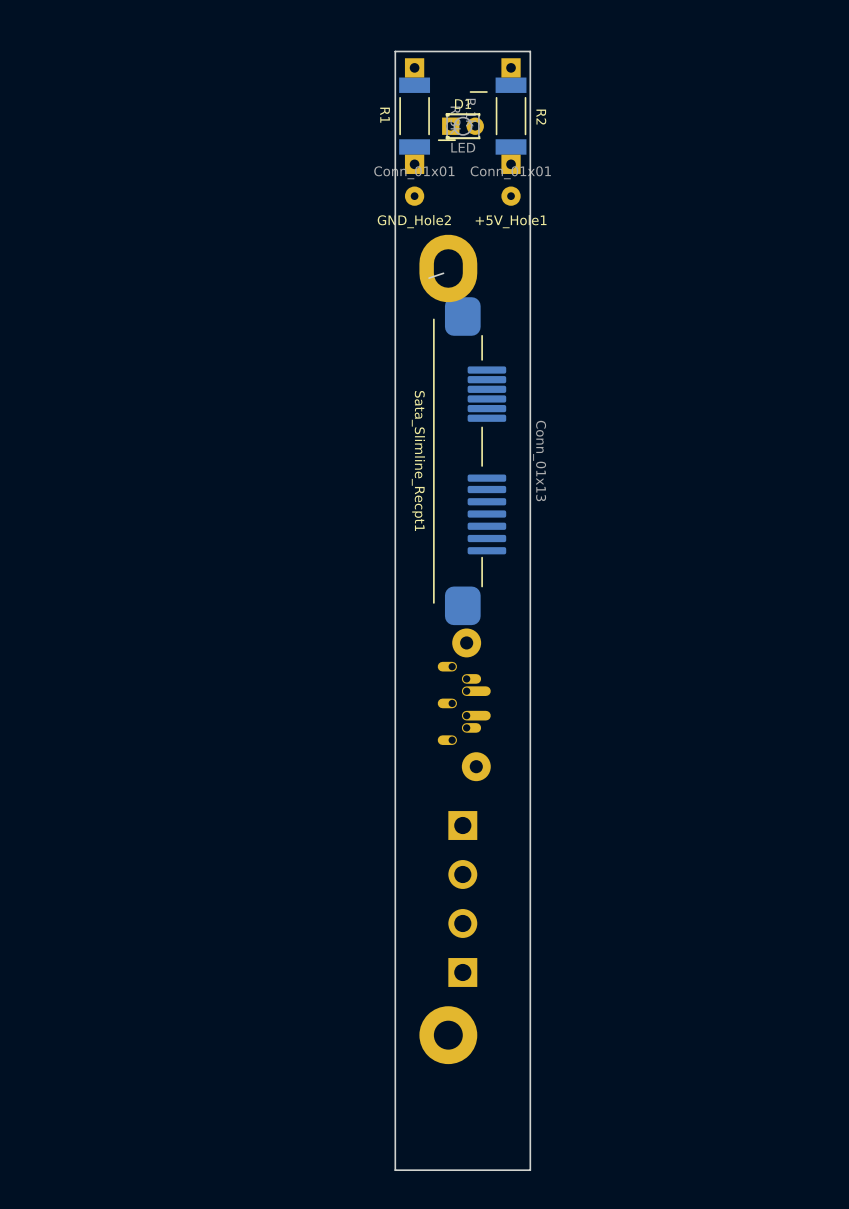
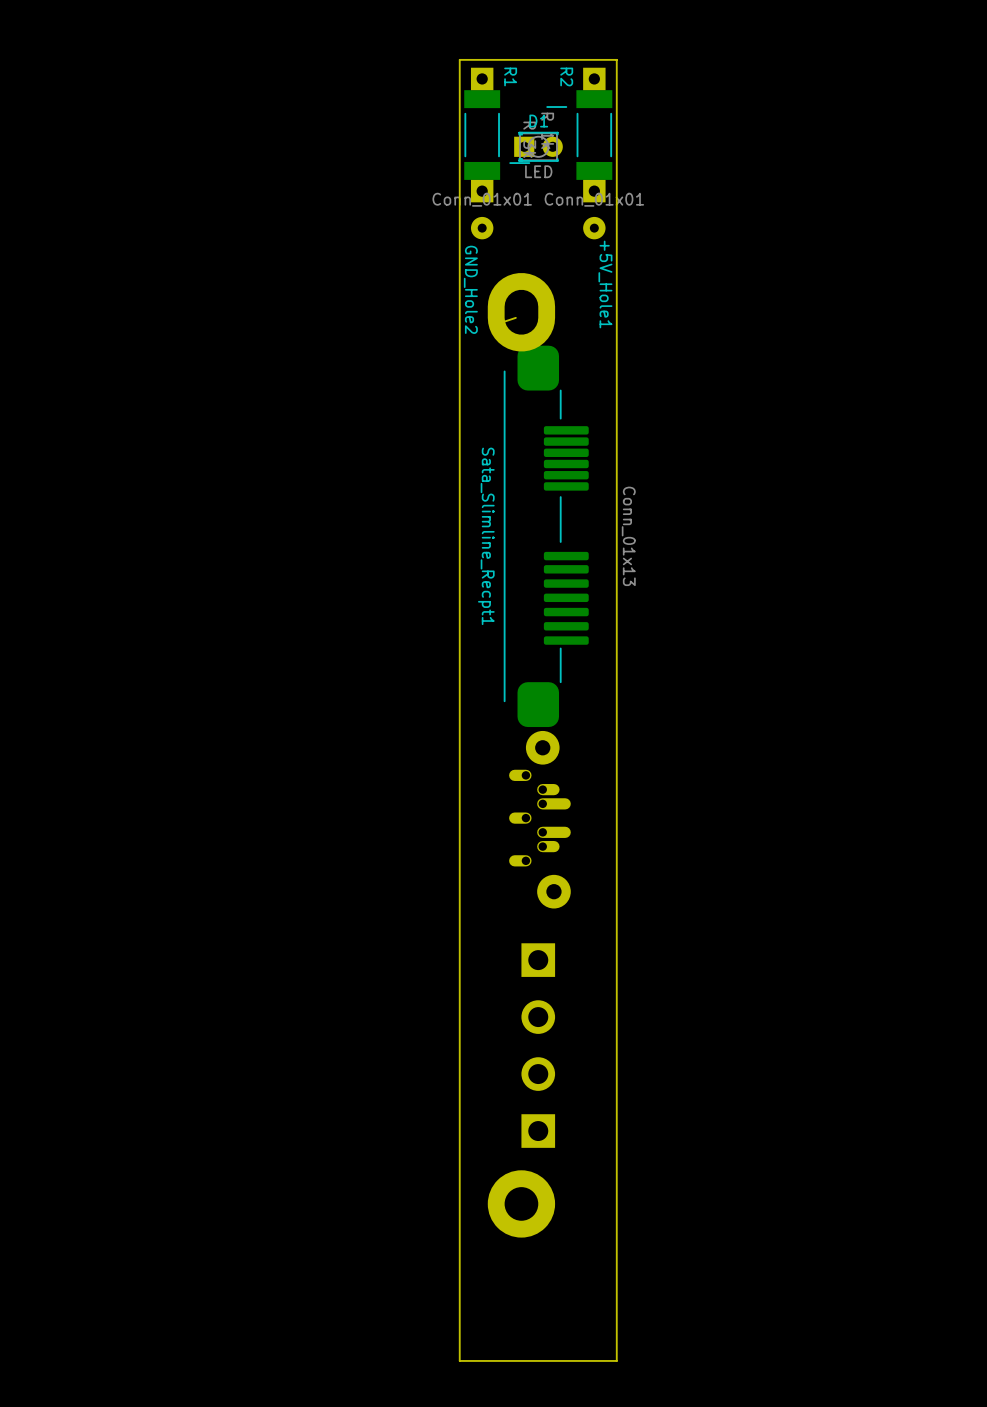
R1 name position: R1 (385, 115) -> R1 (510, 76)
R2 name position: R2 (541, 117) -> R2 (566, 76)
GND_Hole2 name rotation: 0° (414, 221) -> 90° clockwise (470, 289)
+5V_Hole1 name rotation: 0° (511, 221) -> 90° clockwise (605, 284)

